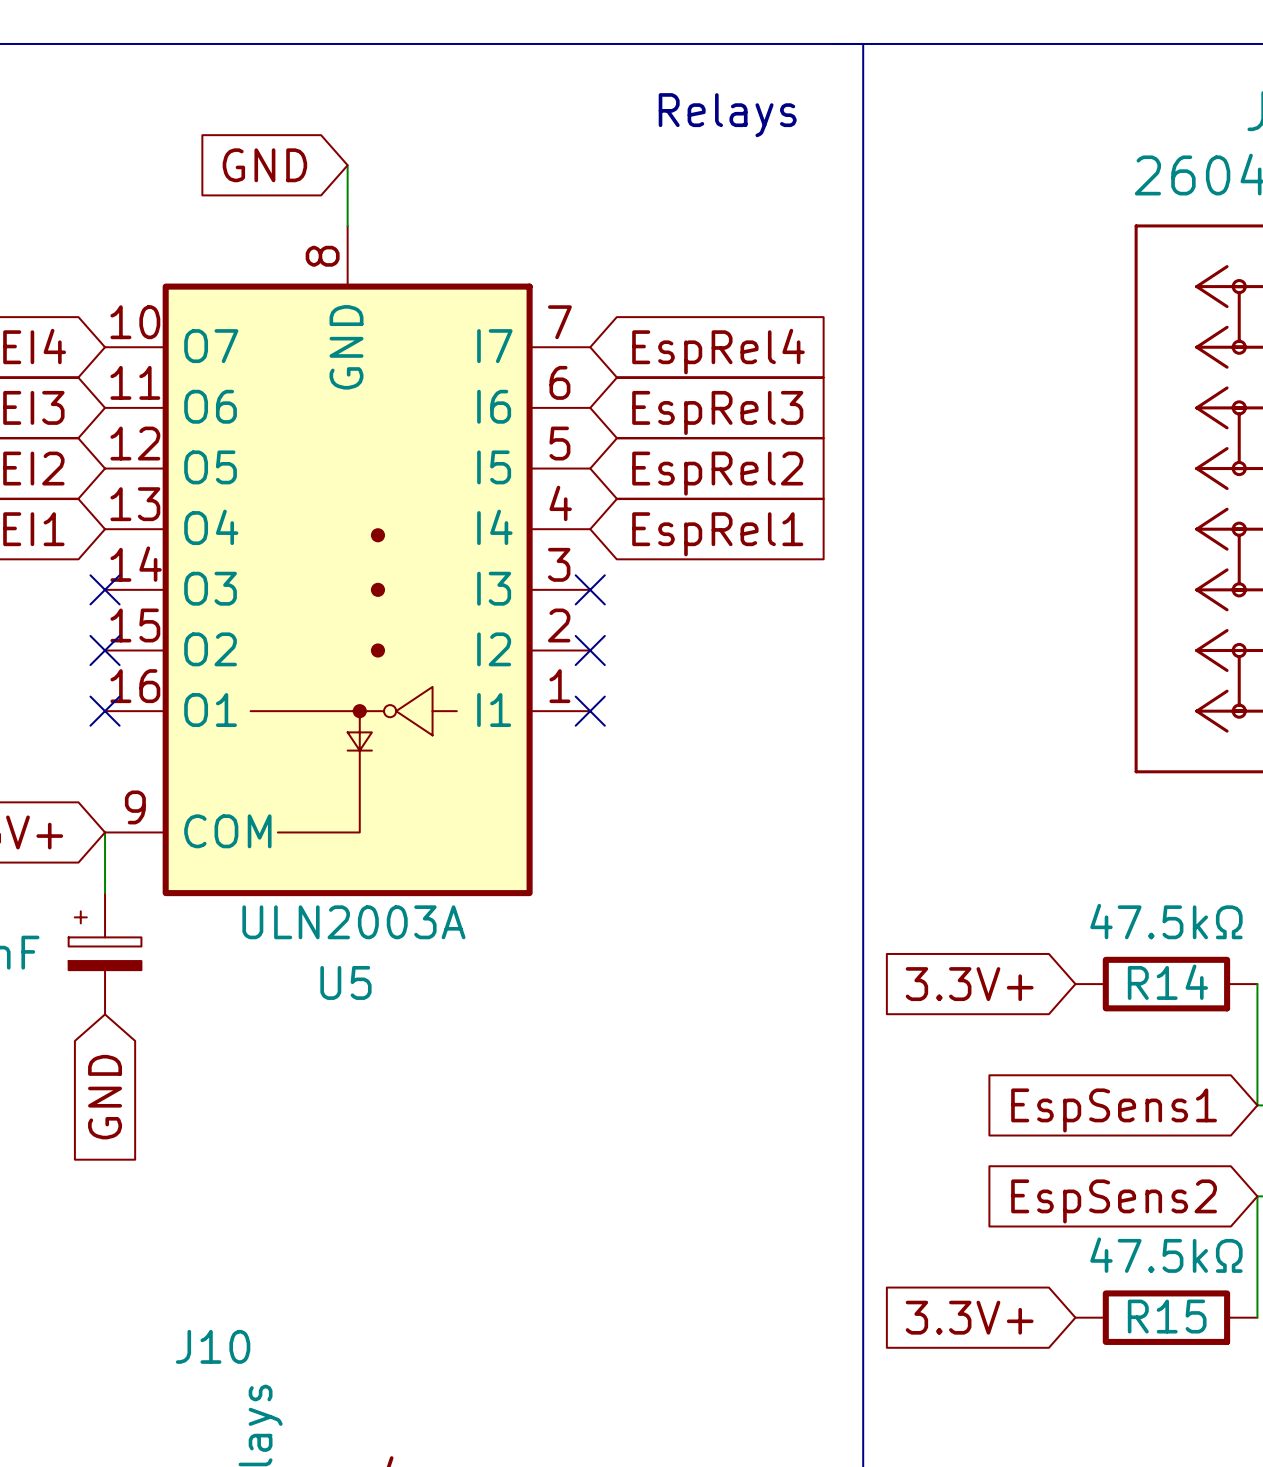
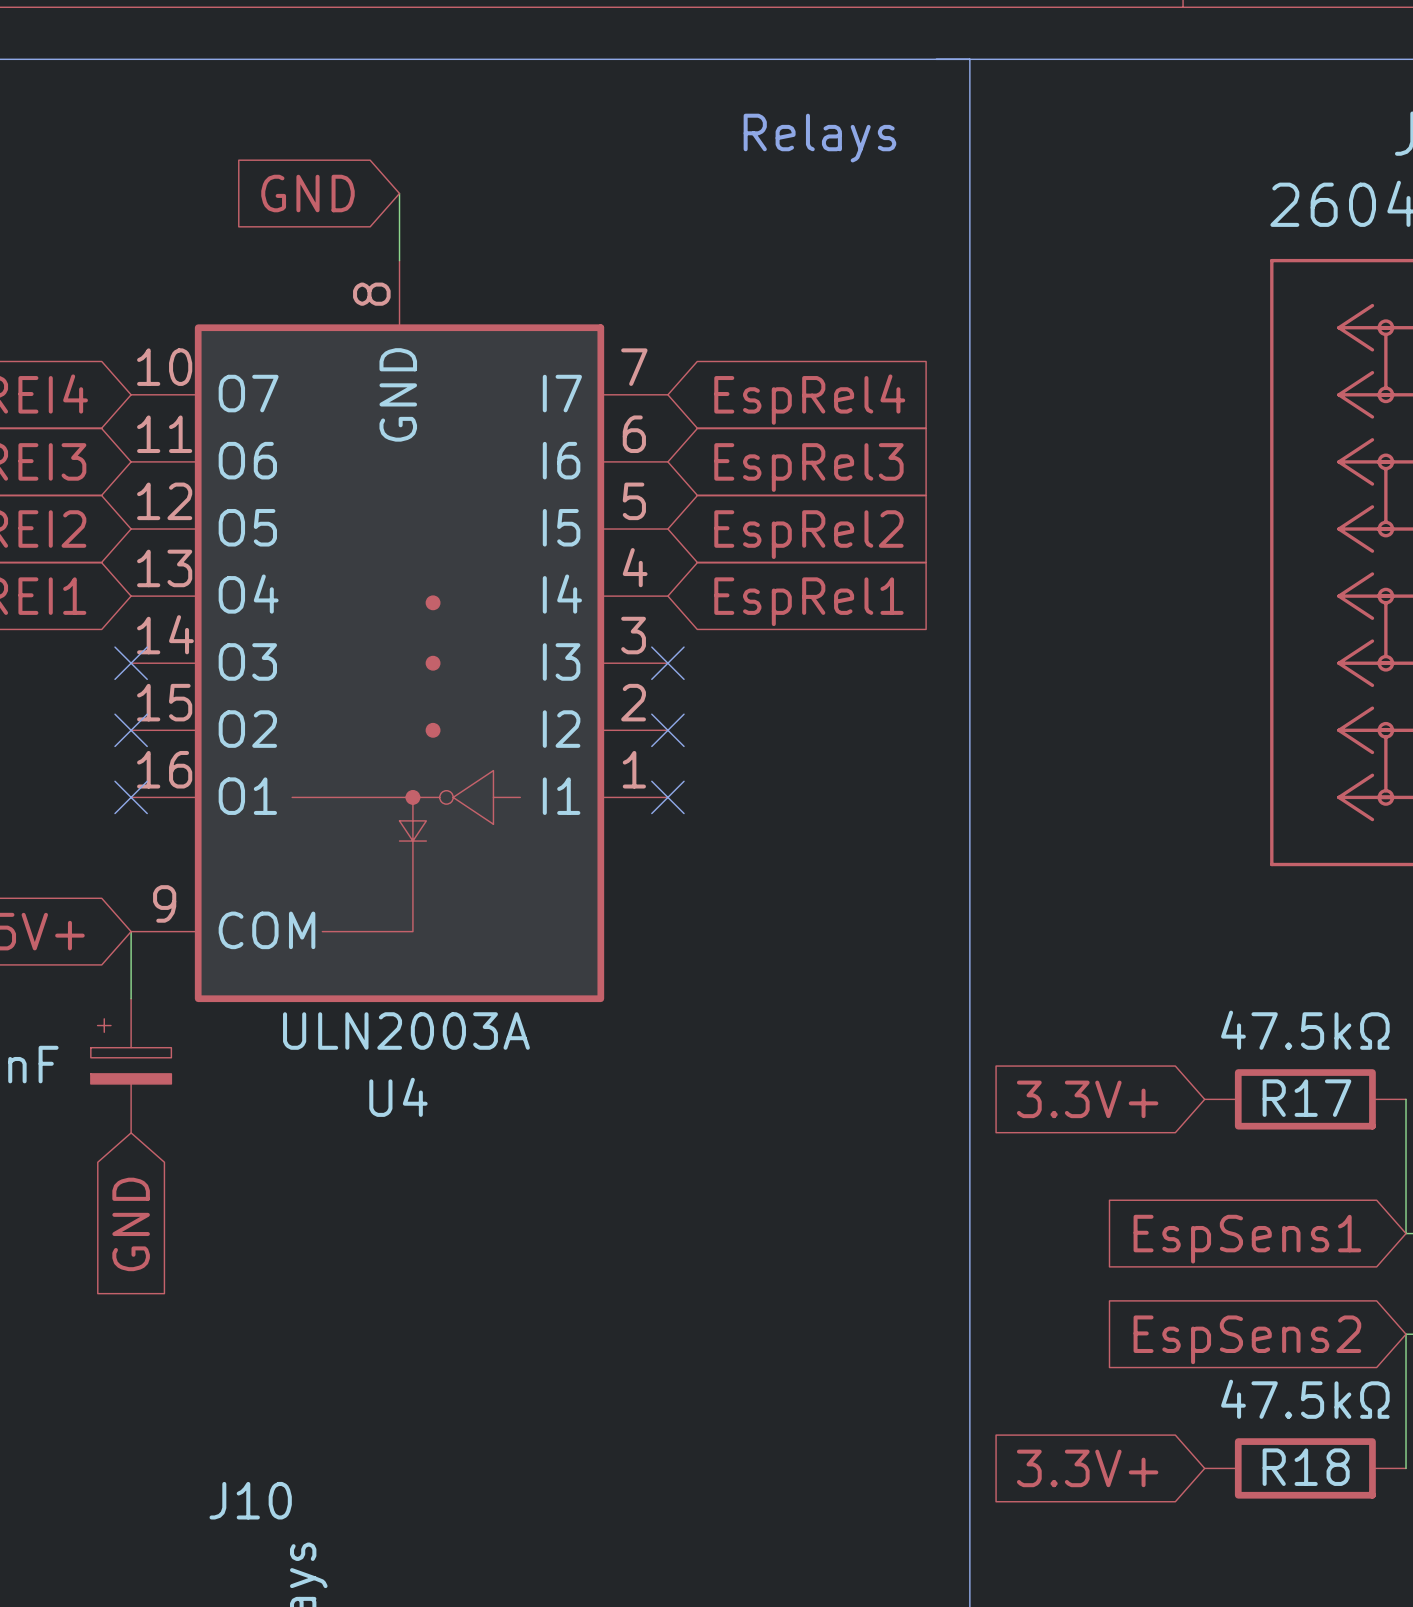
U5 name: U5 (345, 982) -> U4 (398, 1097)
R14 name: R14 (1167, 982) -> R17 (1306, 1098)
R15 name: R15 (1167, 1316) -> R18 (1306, 1467)

